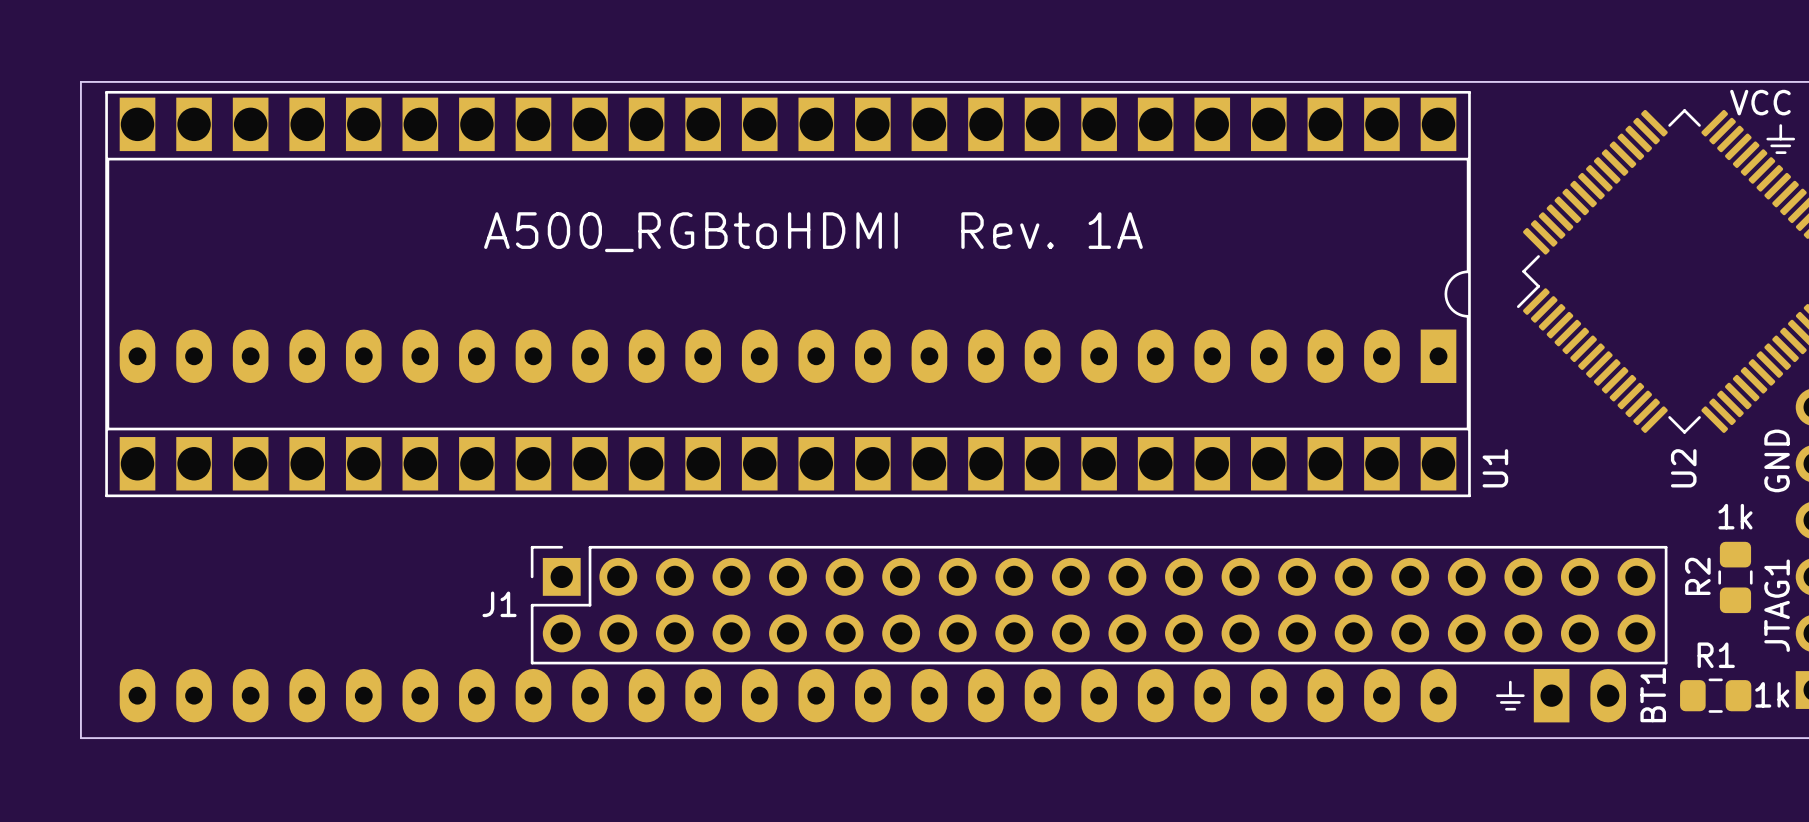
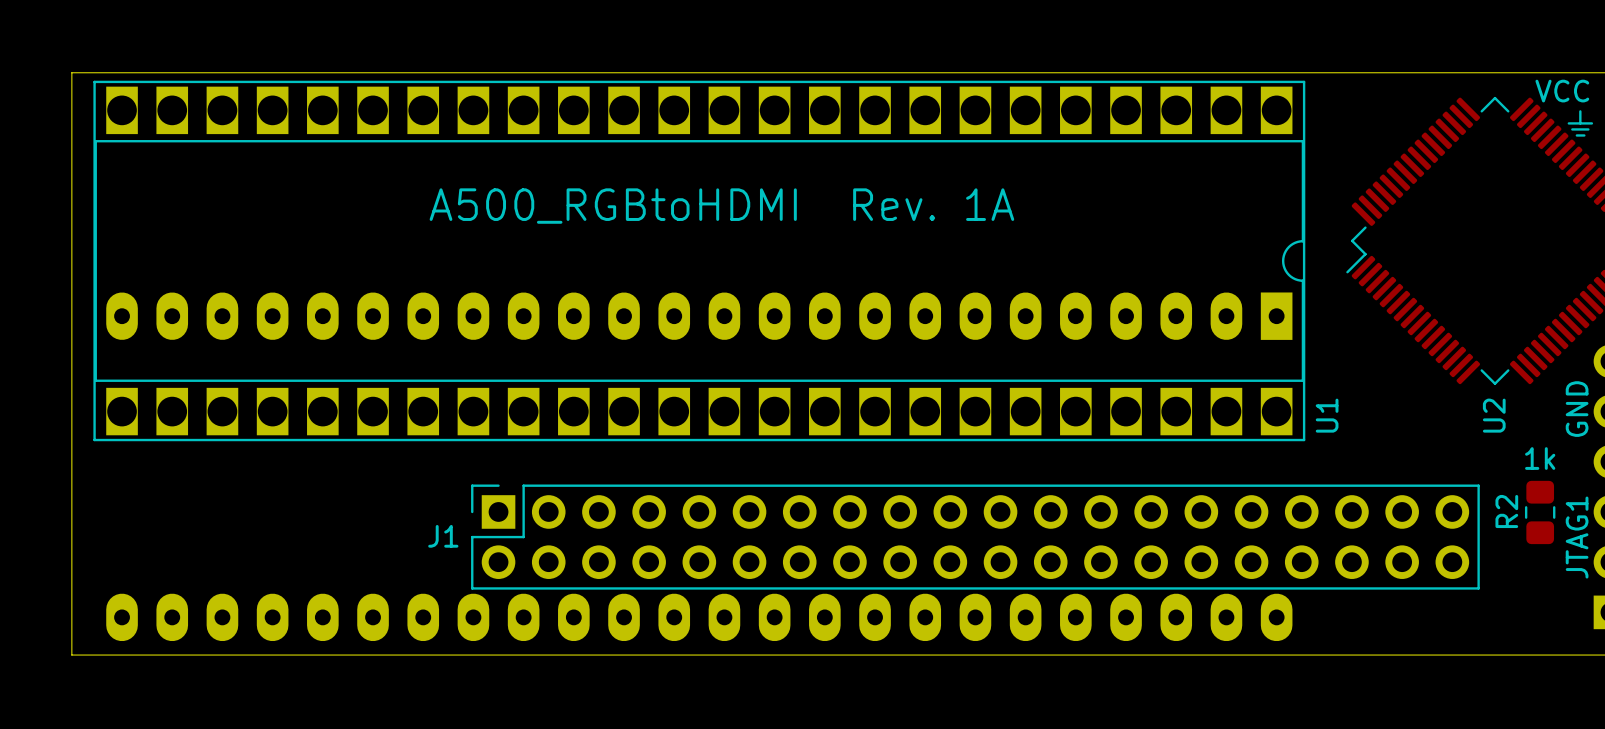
line: (1510, 682) (1510, 695) -> none
text: 1k (1772, 694) -> none
line: (1497, 695) (1523, 695) -> none
BT1: (1579, 695) -> none
R1: (1715, 695) -> none
line: (1501, 702) (1519, 702) -> none
line: (1506, 709) (1514, 709) -> none

